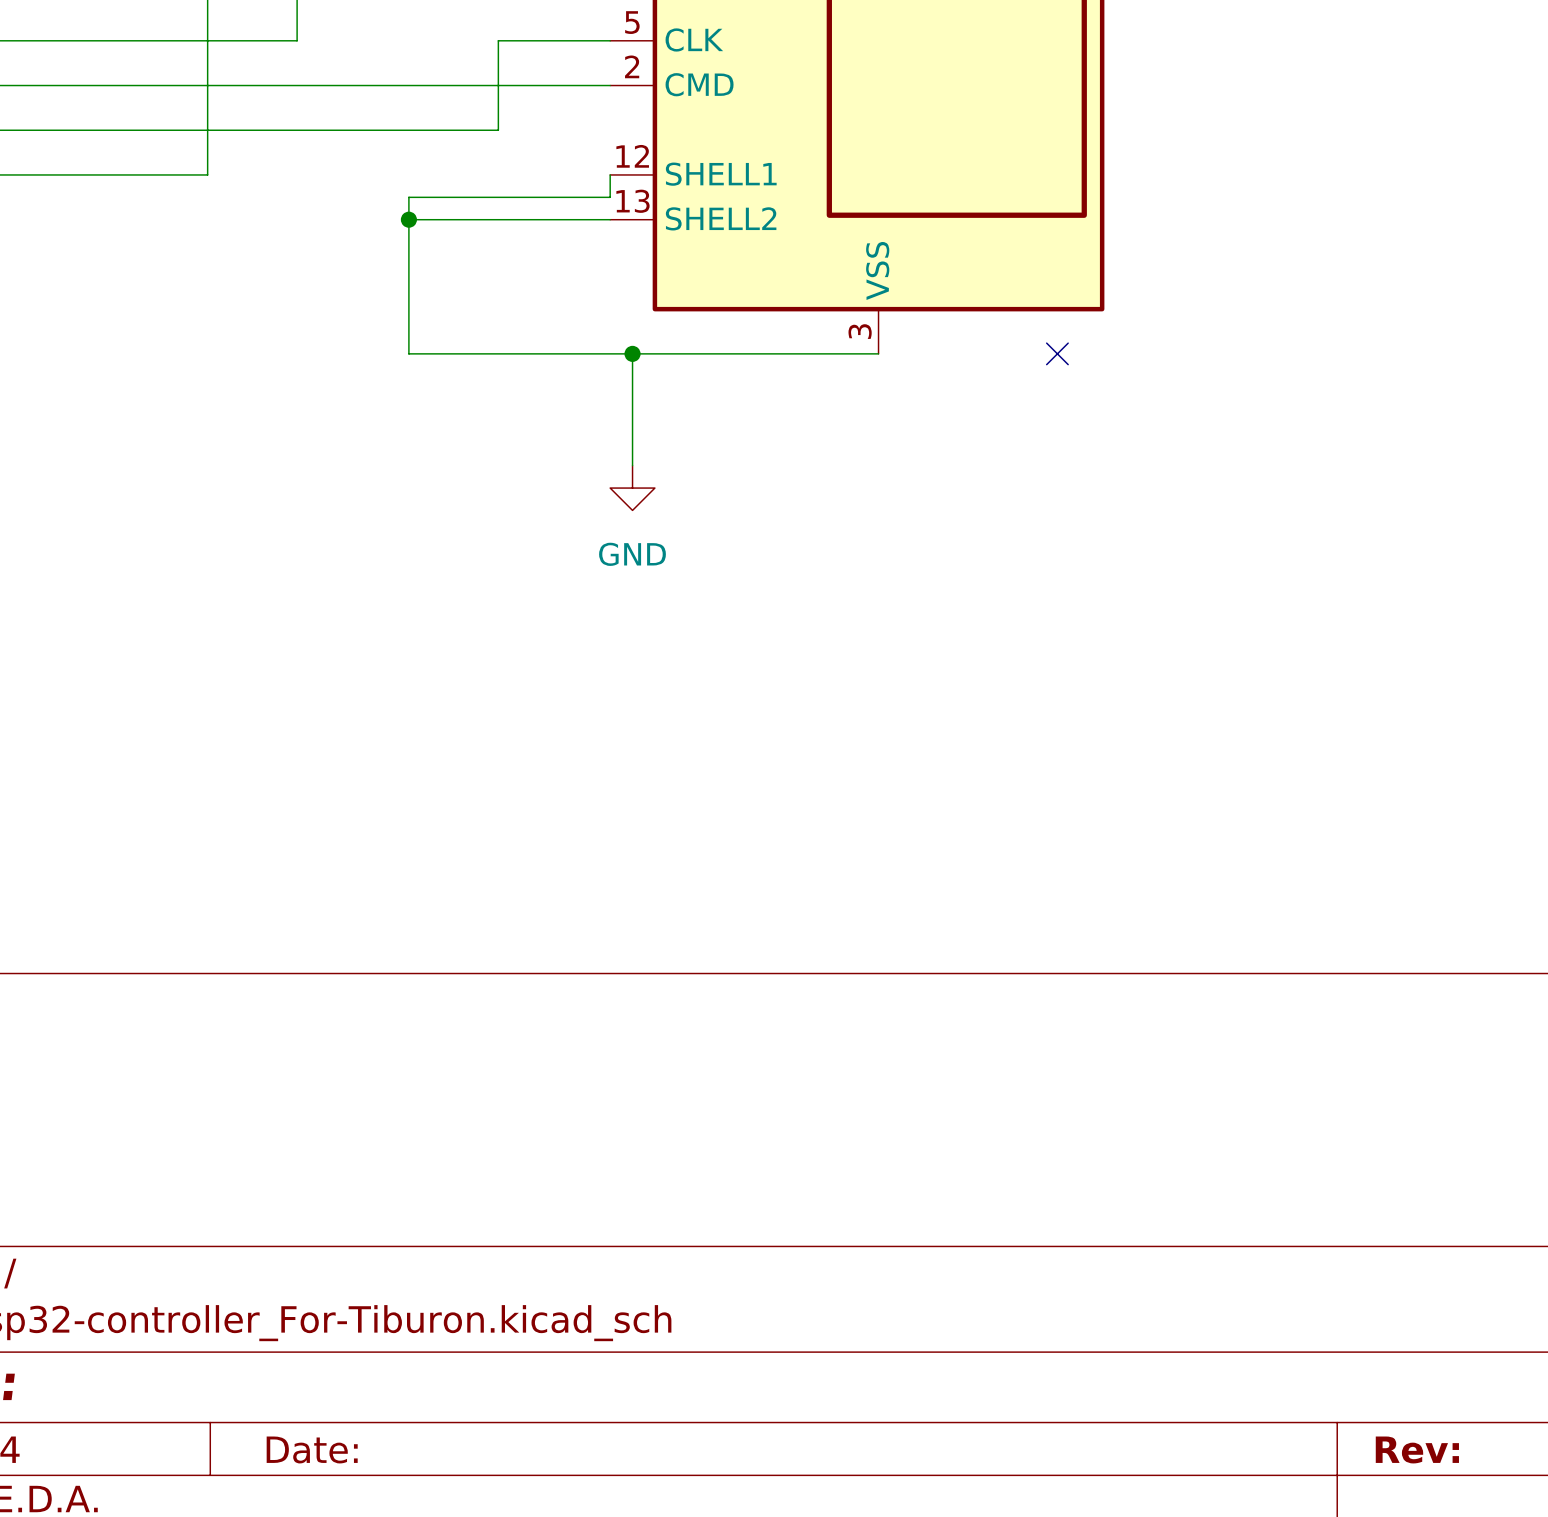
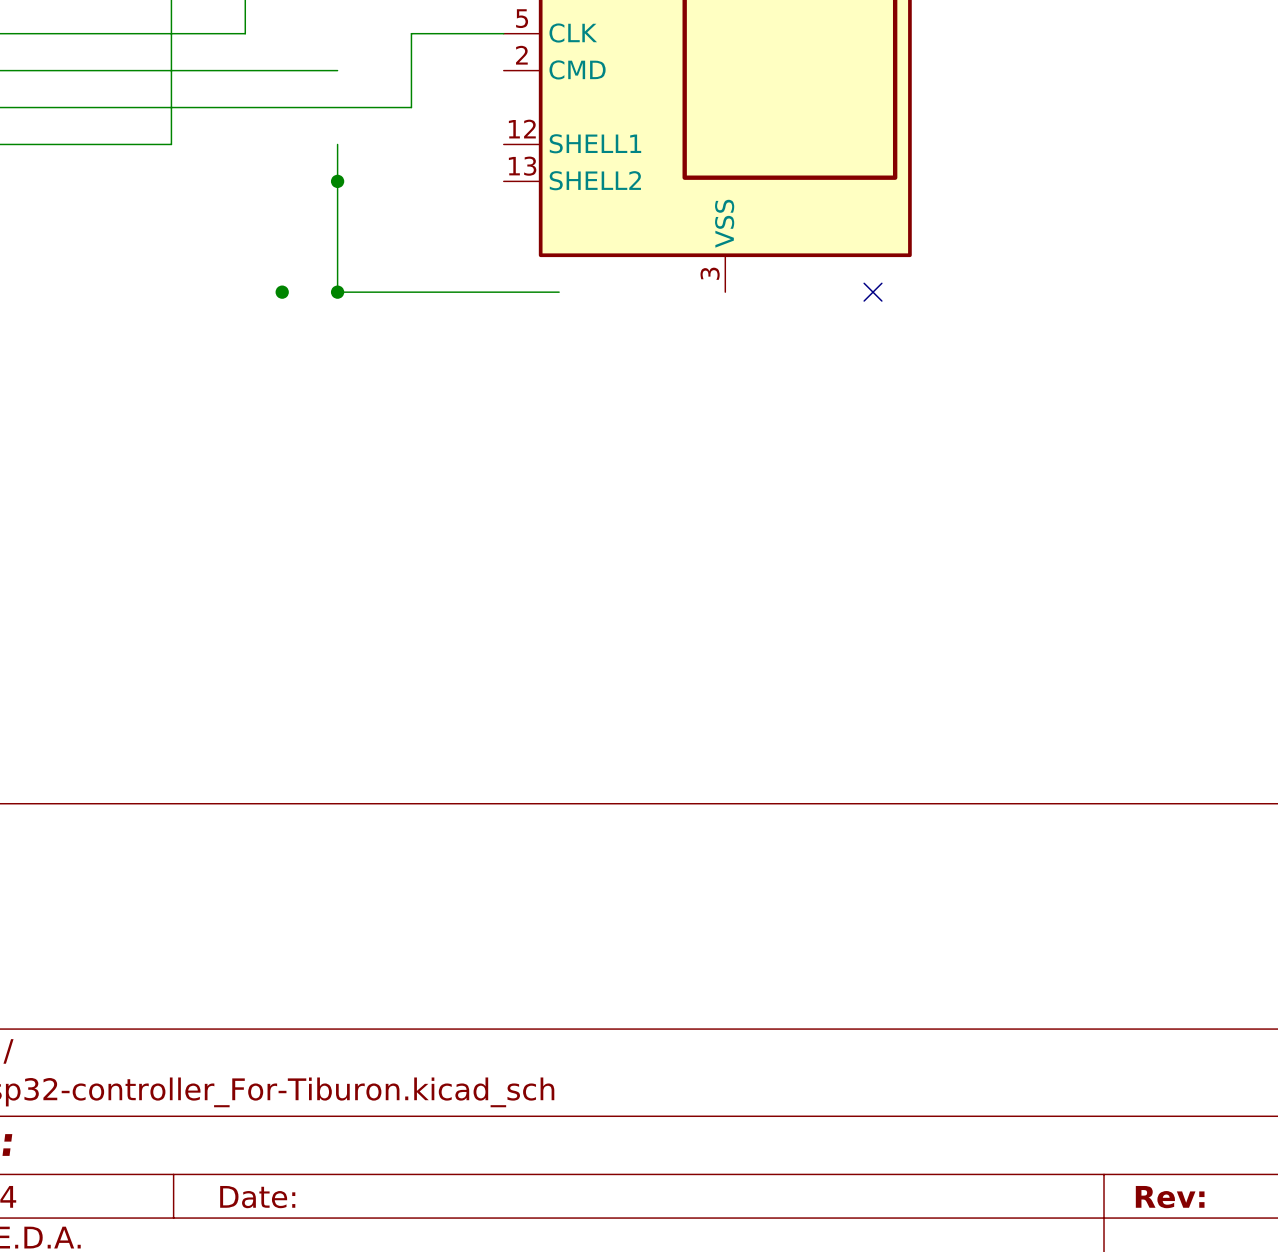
wire: (408, 85) (610, 85) -> none
wire: (610, 174) (610, 197) (408, 197) -> (337, 144) (337, 162)
wire: (408, 219) (610, 219) -> none
junction: none -> (282, 292)
junction: none -> (337, 292)
wire: (632, 353) (632, 465) -> none
junction: (632, 353) -> none
wire: (677, 353) (878, 353) -> none
power symbol: GND (632, 488) -> none

